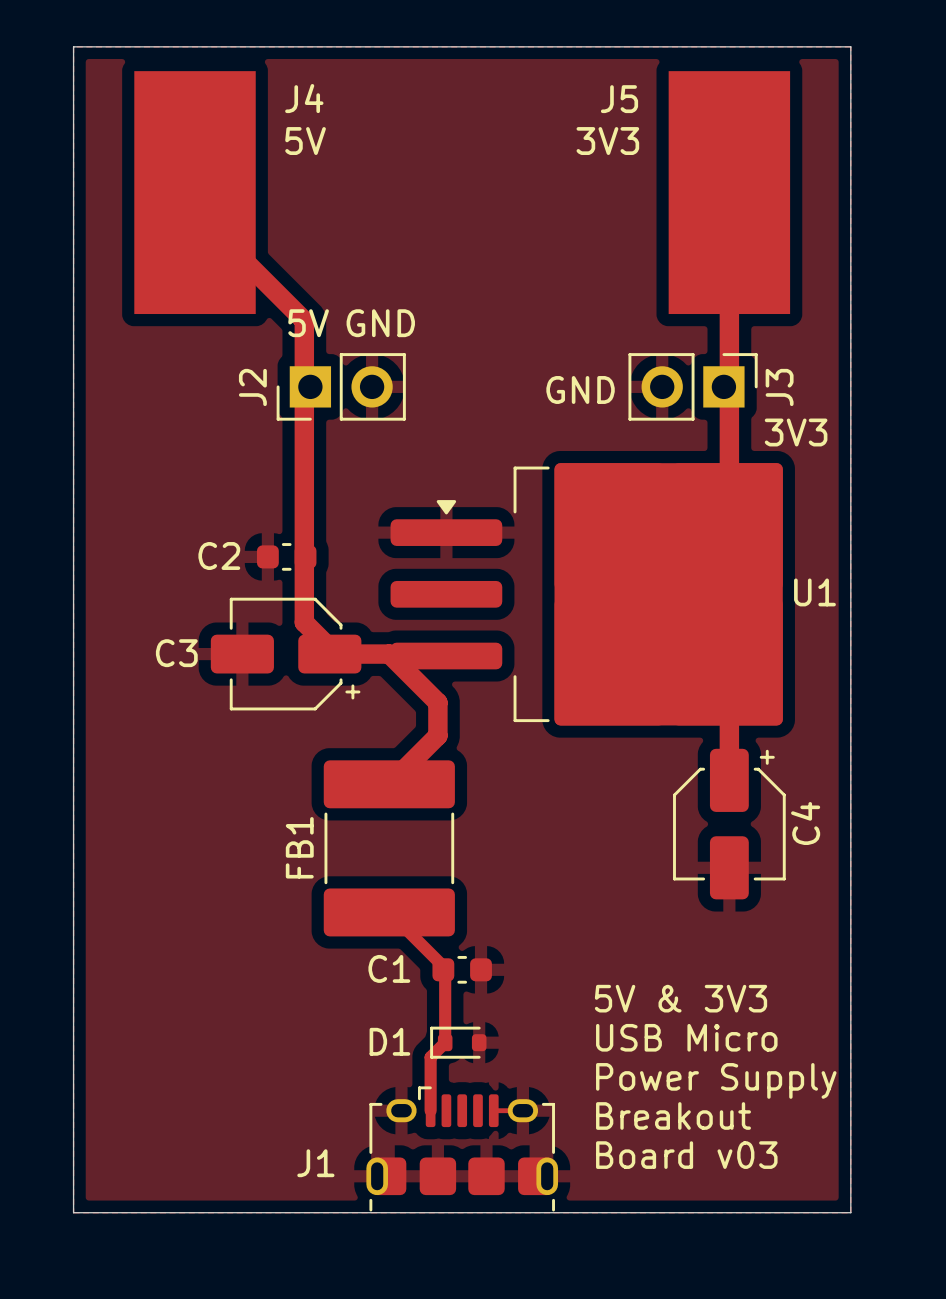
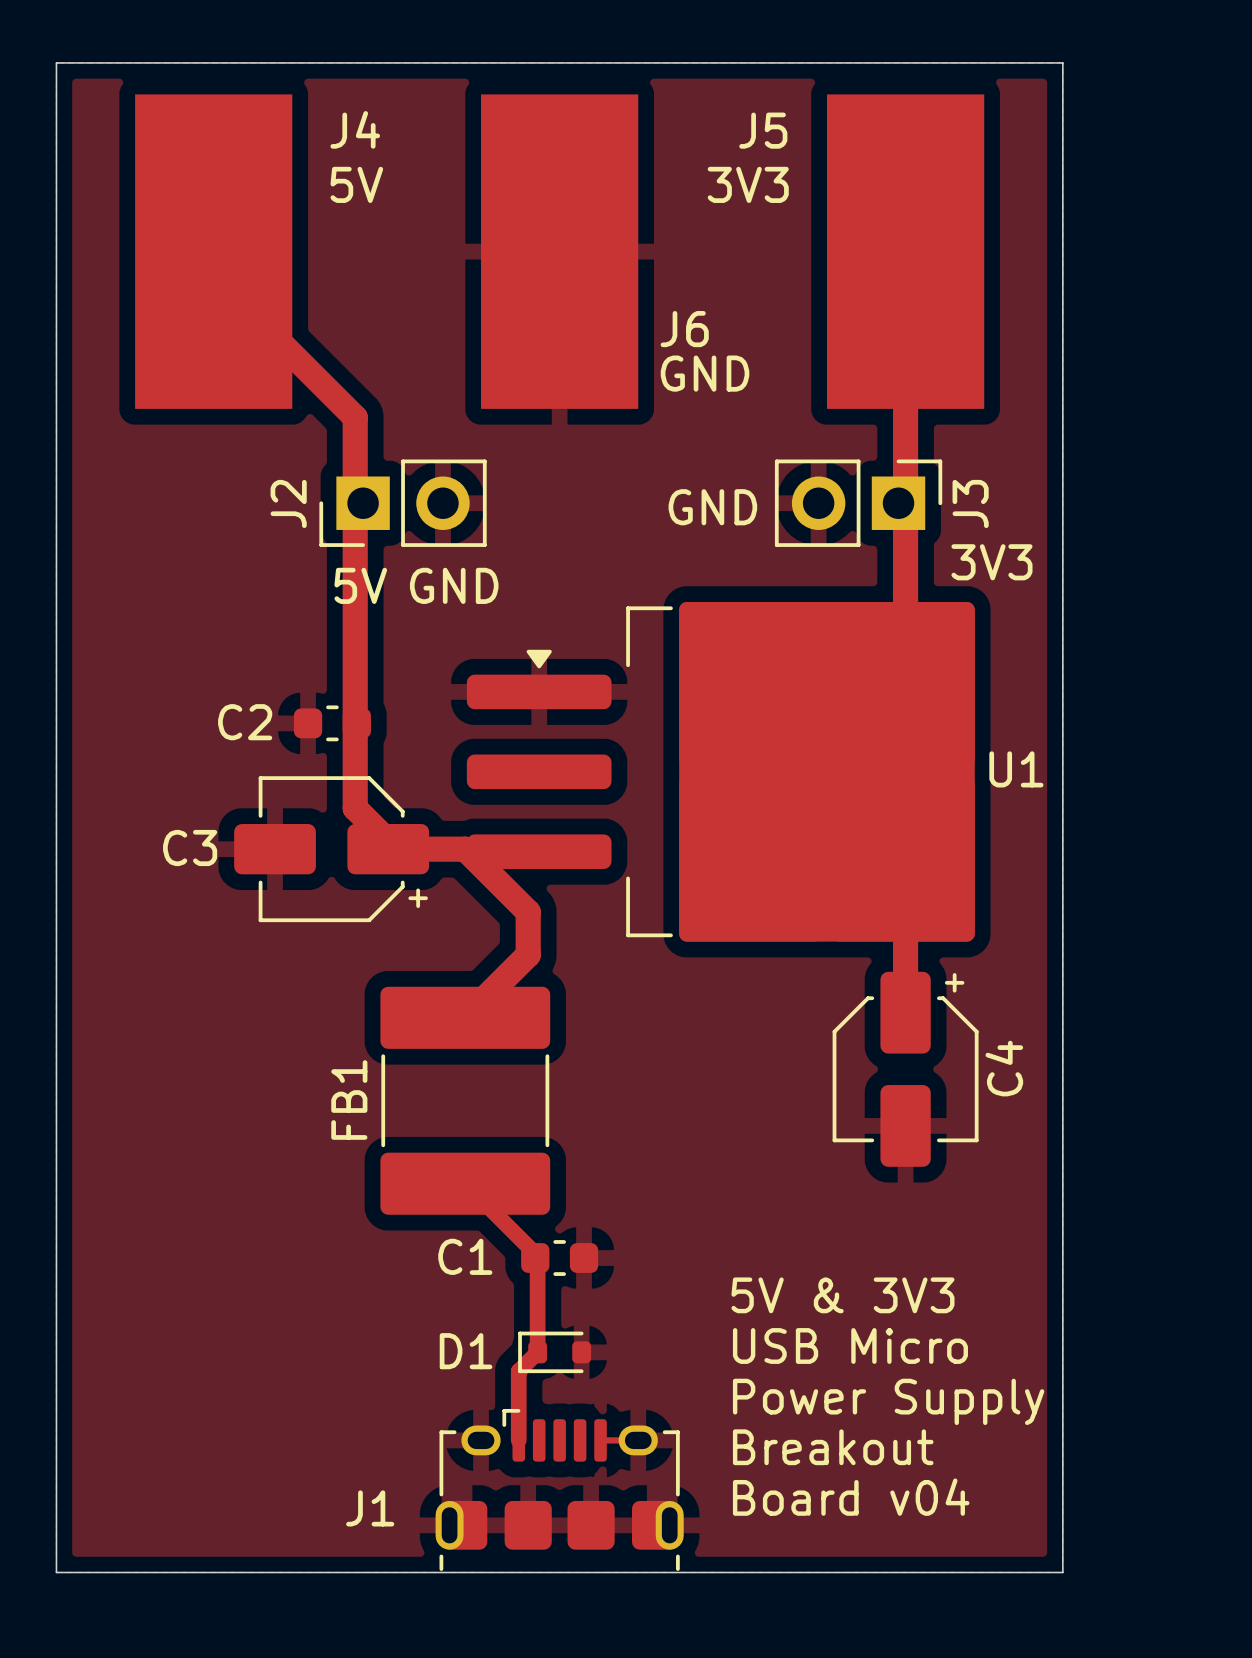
J6: none -> (559, 251)
text: none -> GND (705, 373)
text position: 5V (308, 323) -> 5V (360, 585)
text: GND (380, 323) -> none
text: none -> GND (454, 585)
text: Board v03 (686, 1155) -> Board v04 (851, 1497)

